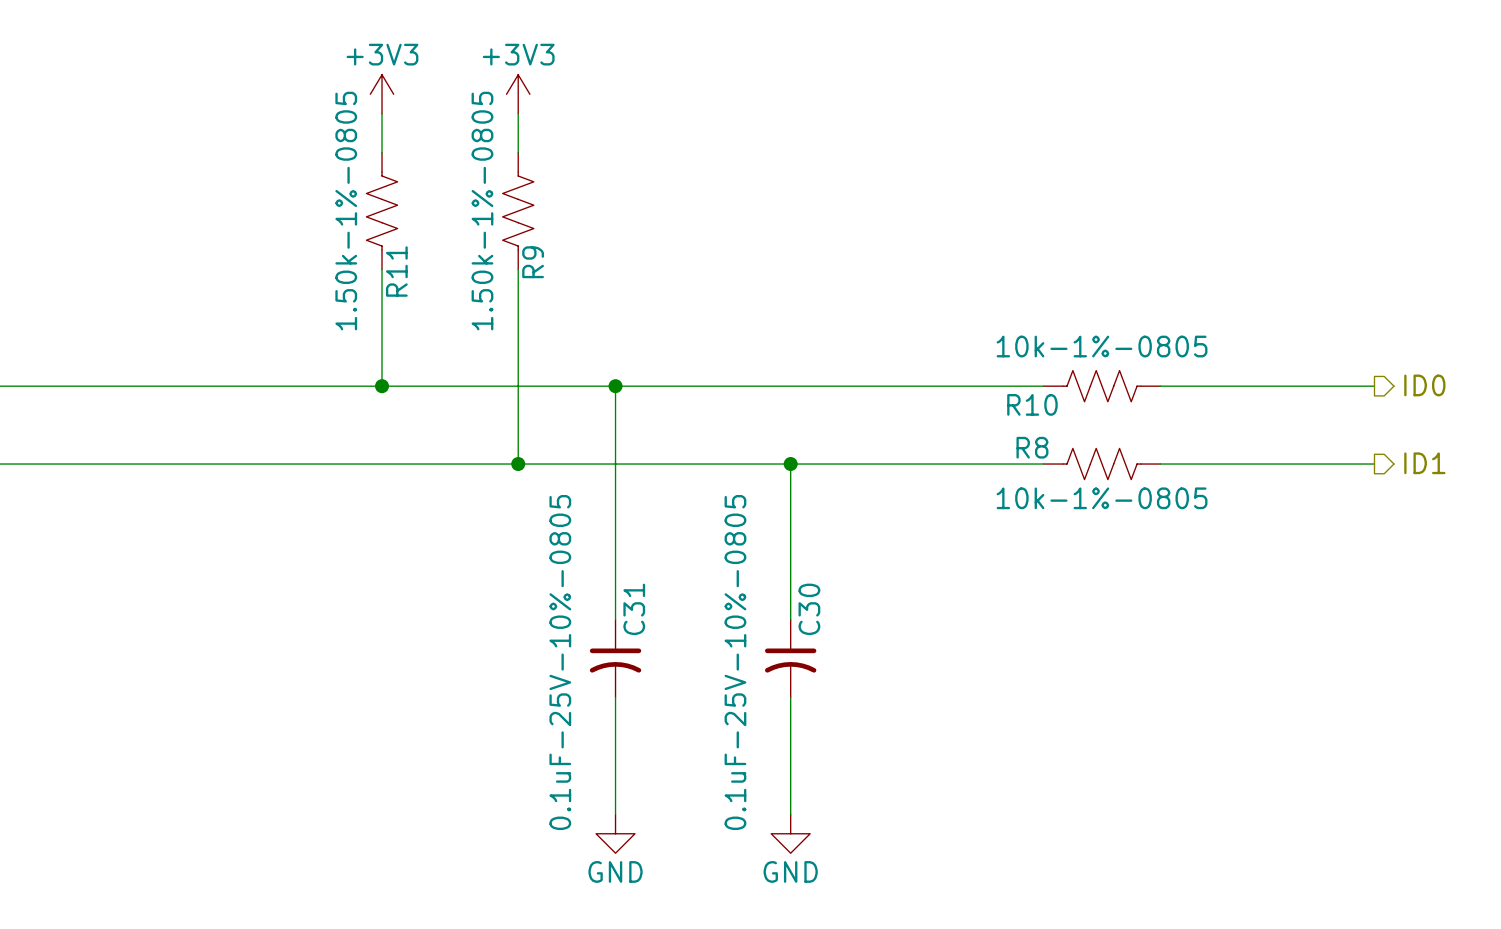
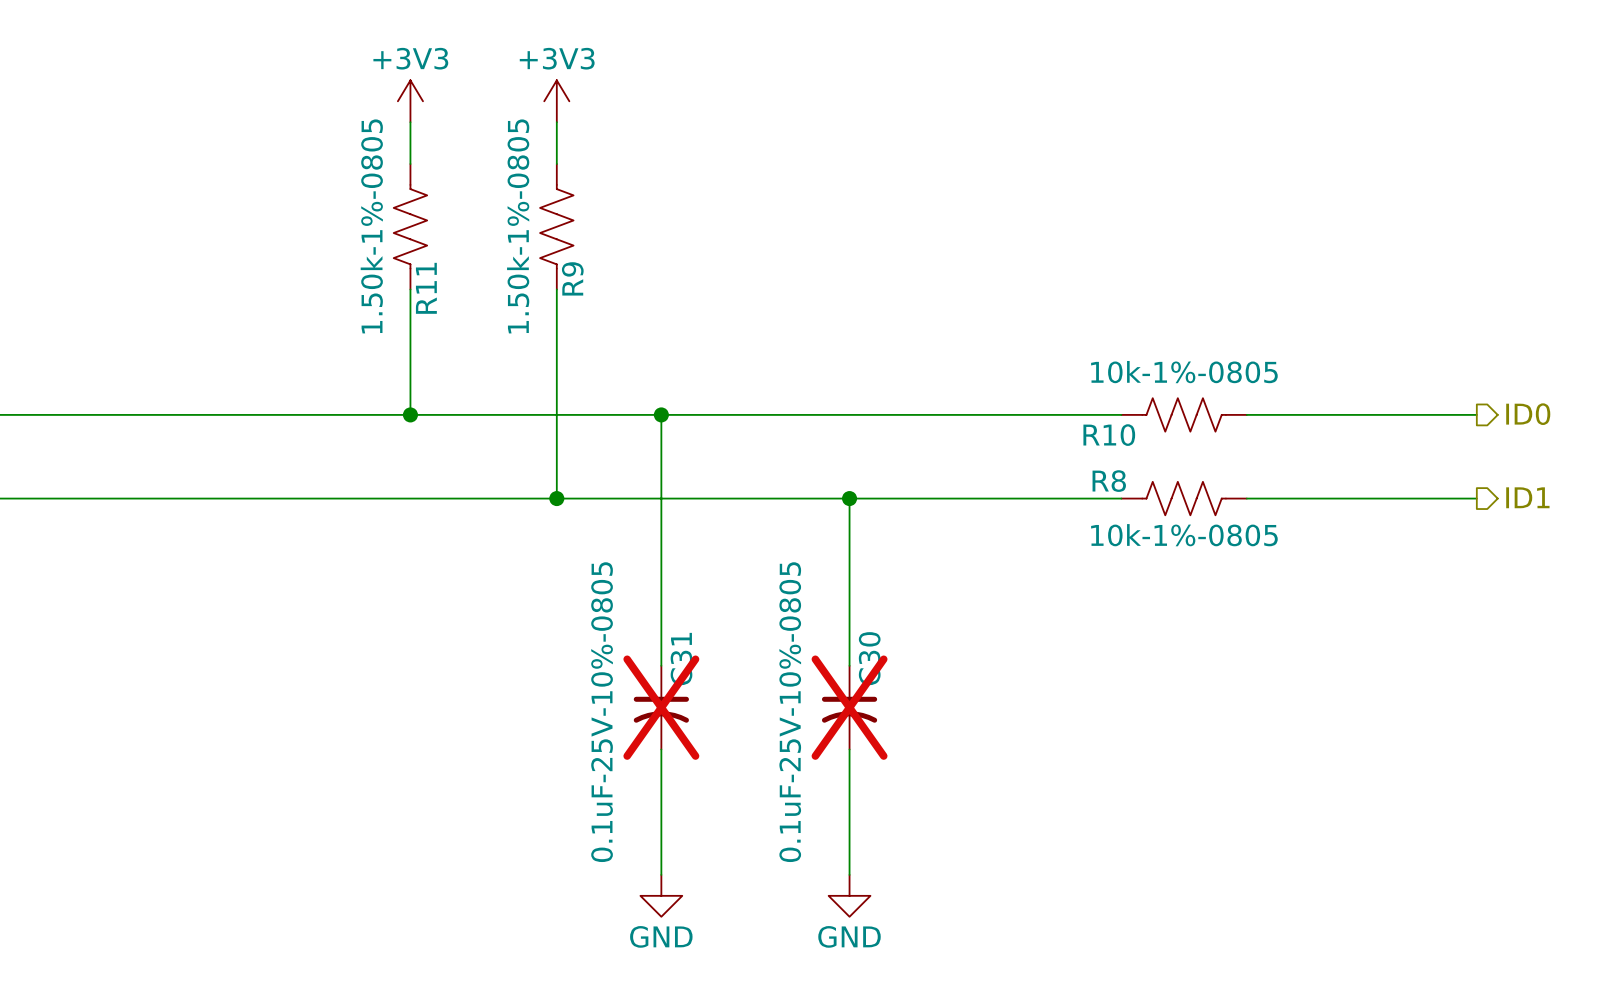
C31 do-not-place cross: none -> (661, 707)
C30 do-not-place cross: none -> (849, 707)

